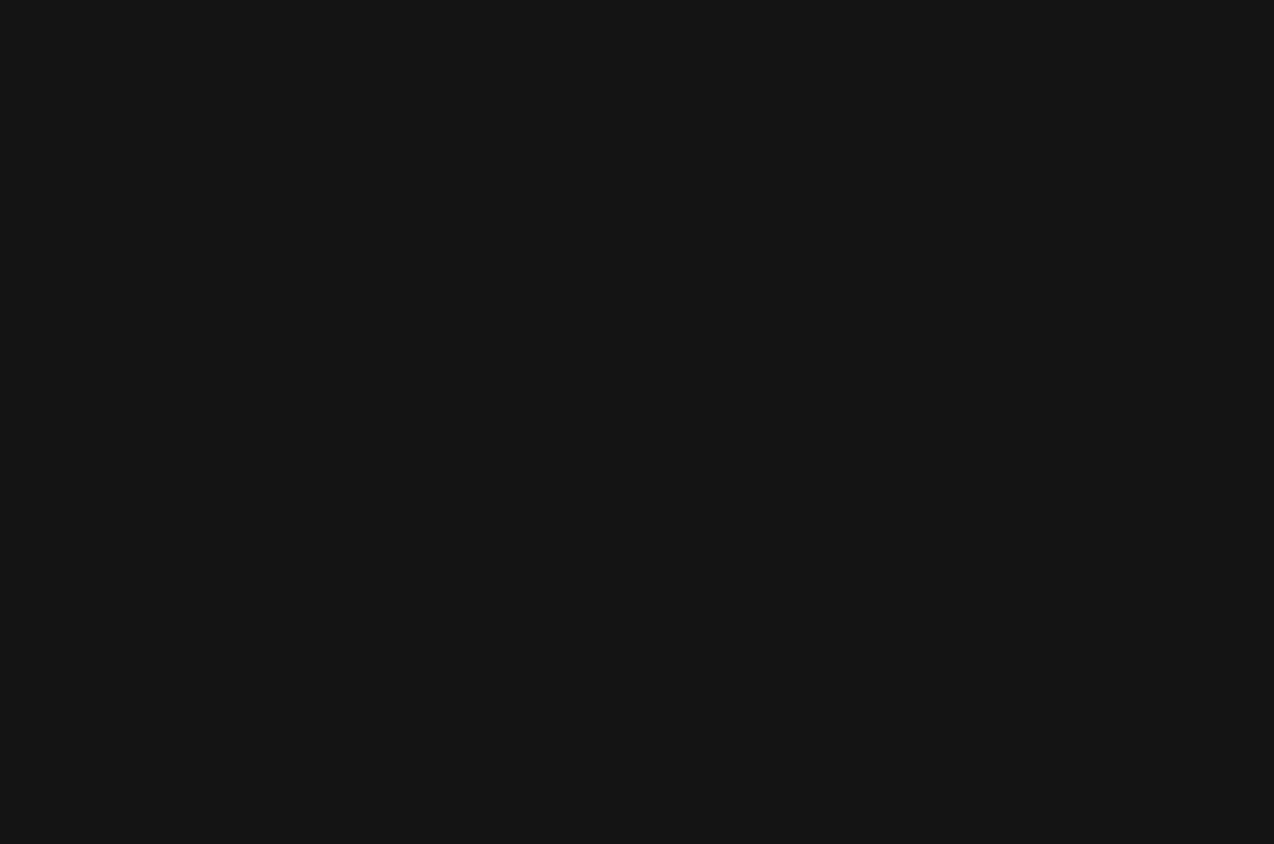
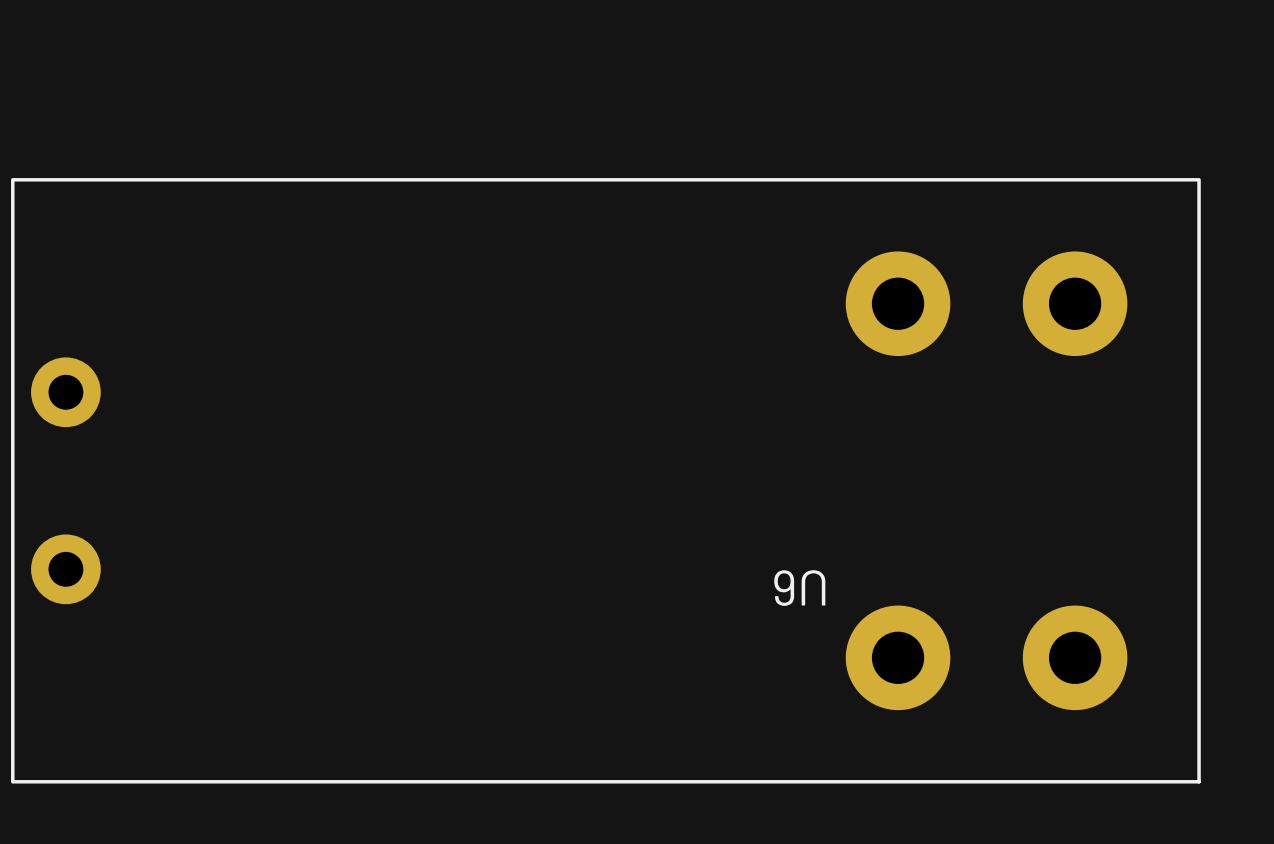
U6: none -> (605, 480)

